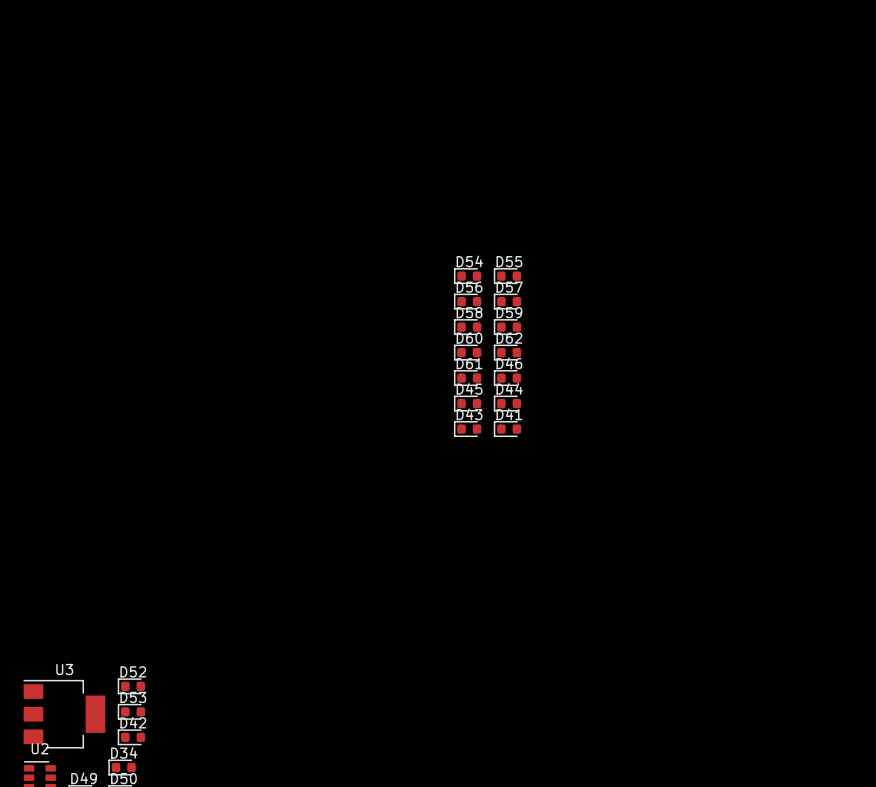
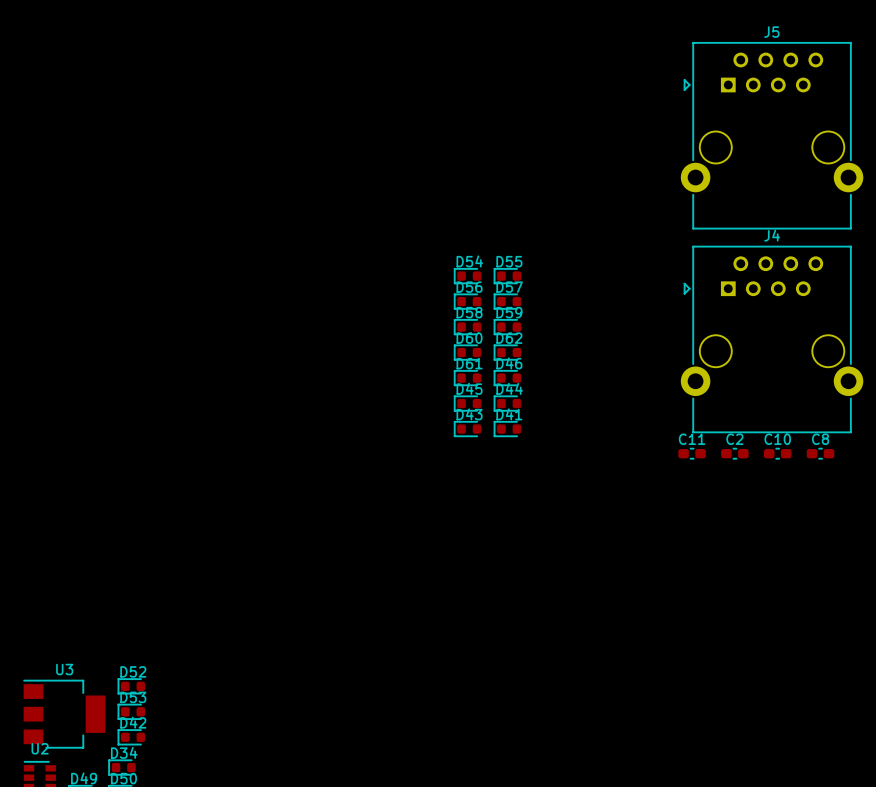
J5: none -> (772, 135)
J4: none -> (772, 339)
C11: none -> (692, 453)
C2: none -> (734, 453)
C10: none -> (777, 453)
C8: none -> (820, 453)

